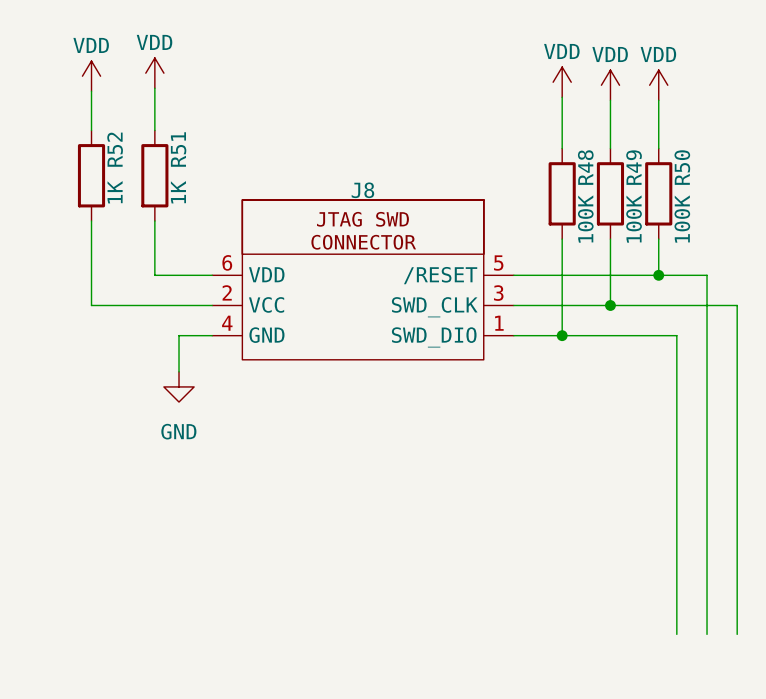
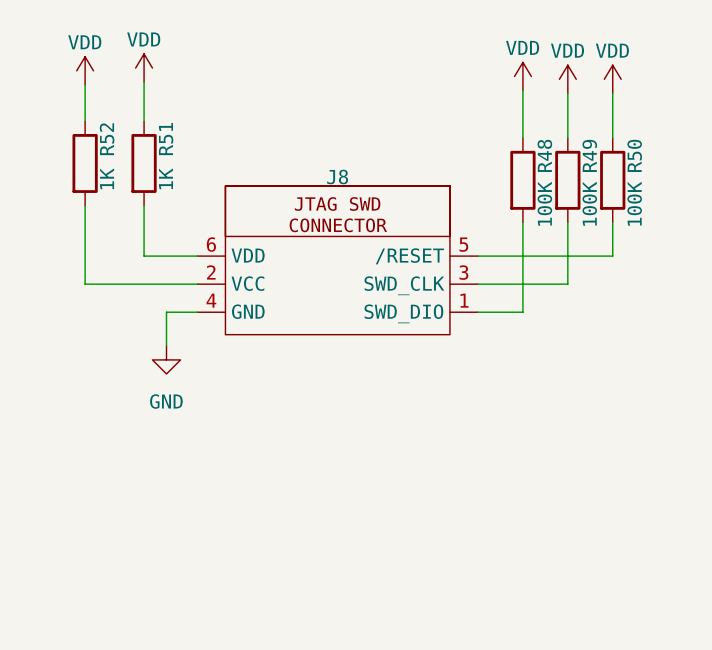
wire: (658, 275) (707, 275) (707, 634) -> none
junction: (658, 275) -> none
wire: (610, 305) (737, 305) (737, 634) -> none
junction: (610, 305) -> none
wire: (562, 335) (676, 335) (676, 634) -> none
junction: (562, 335) -> none

